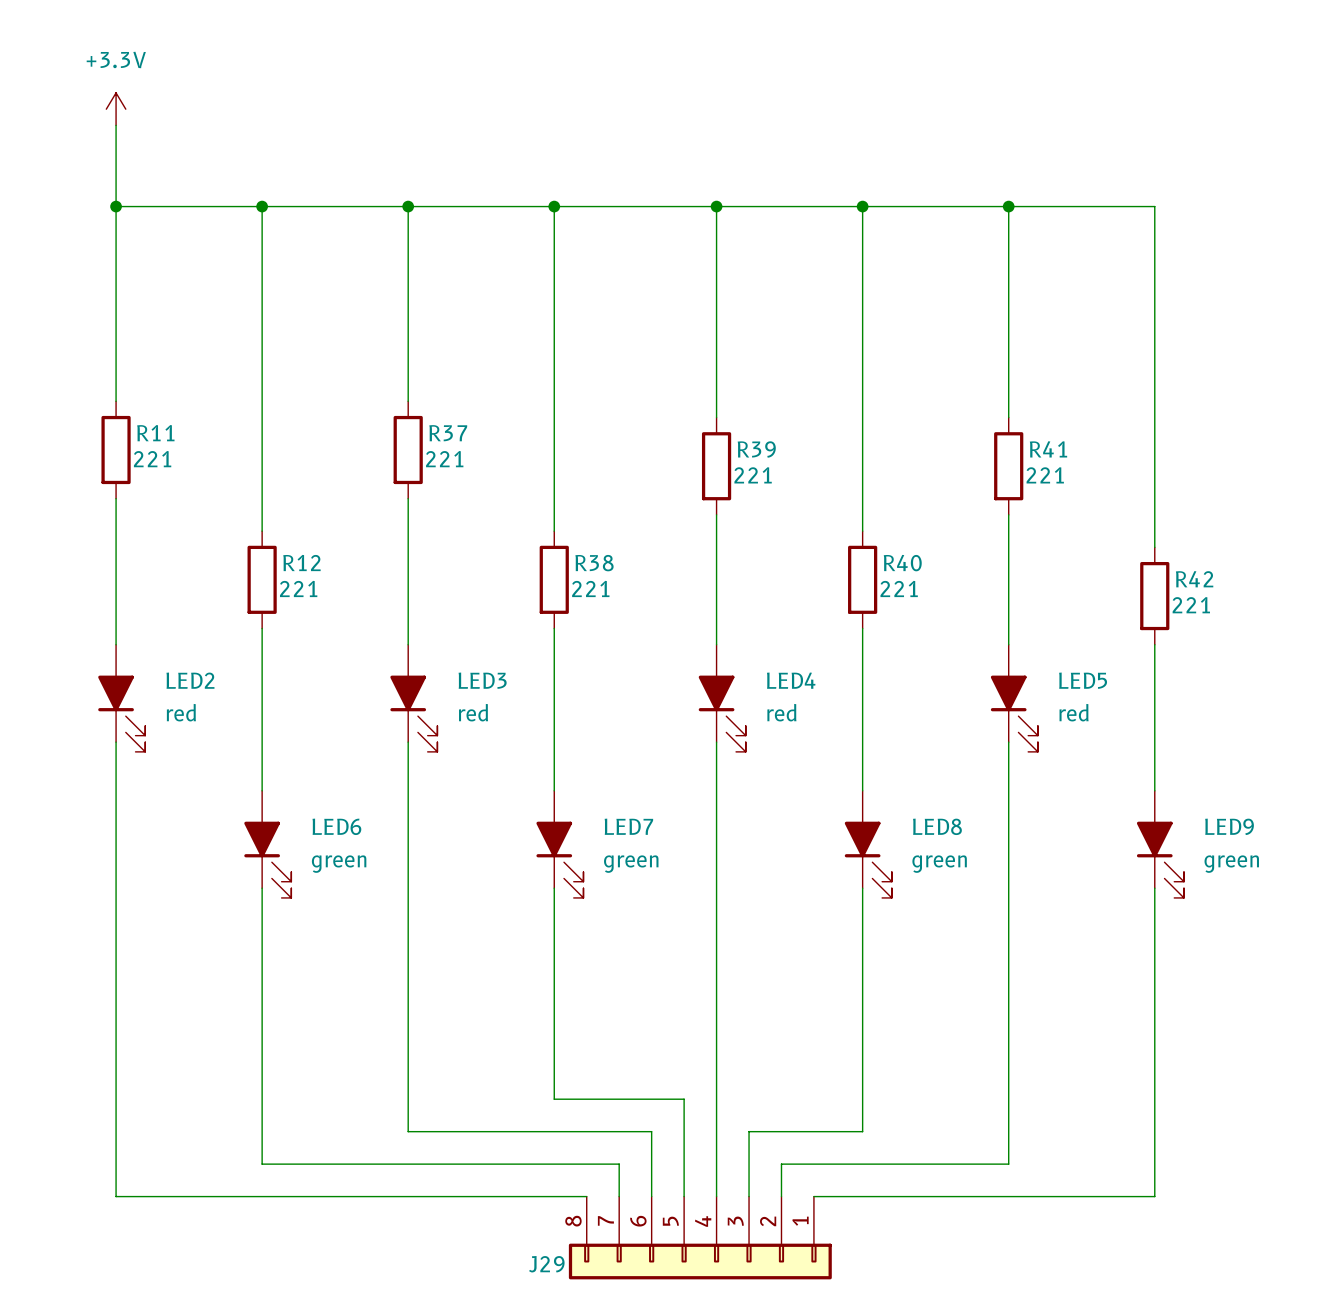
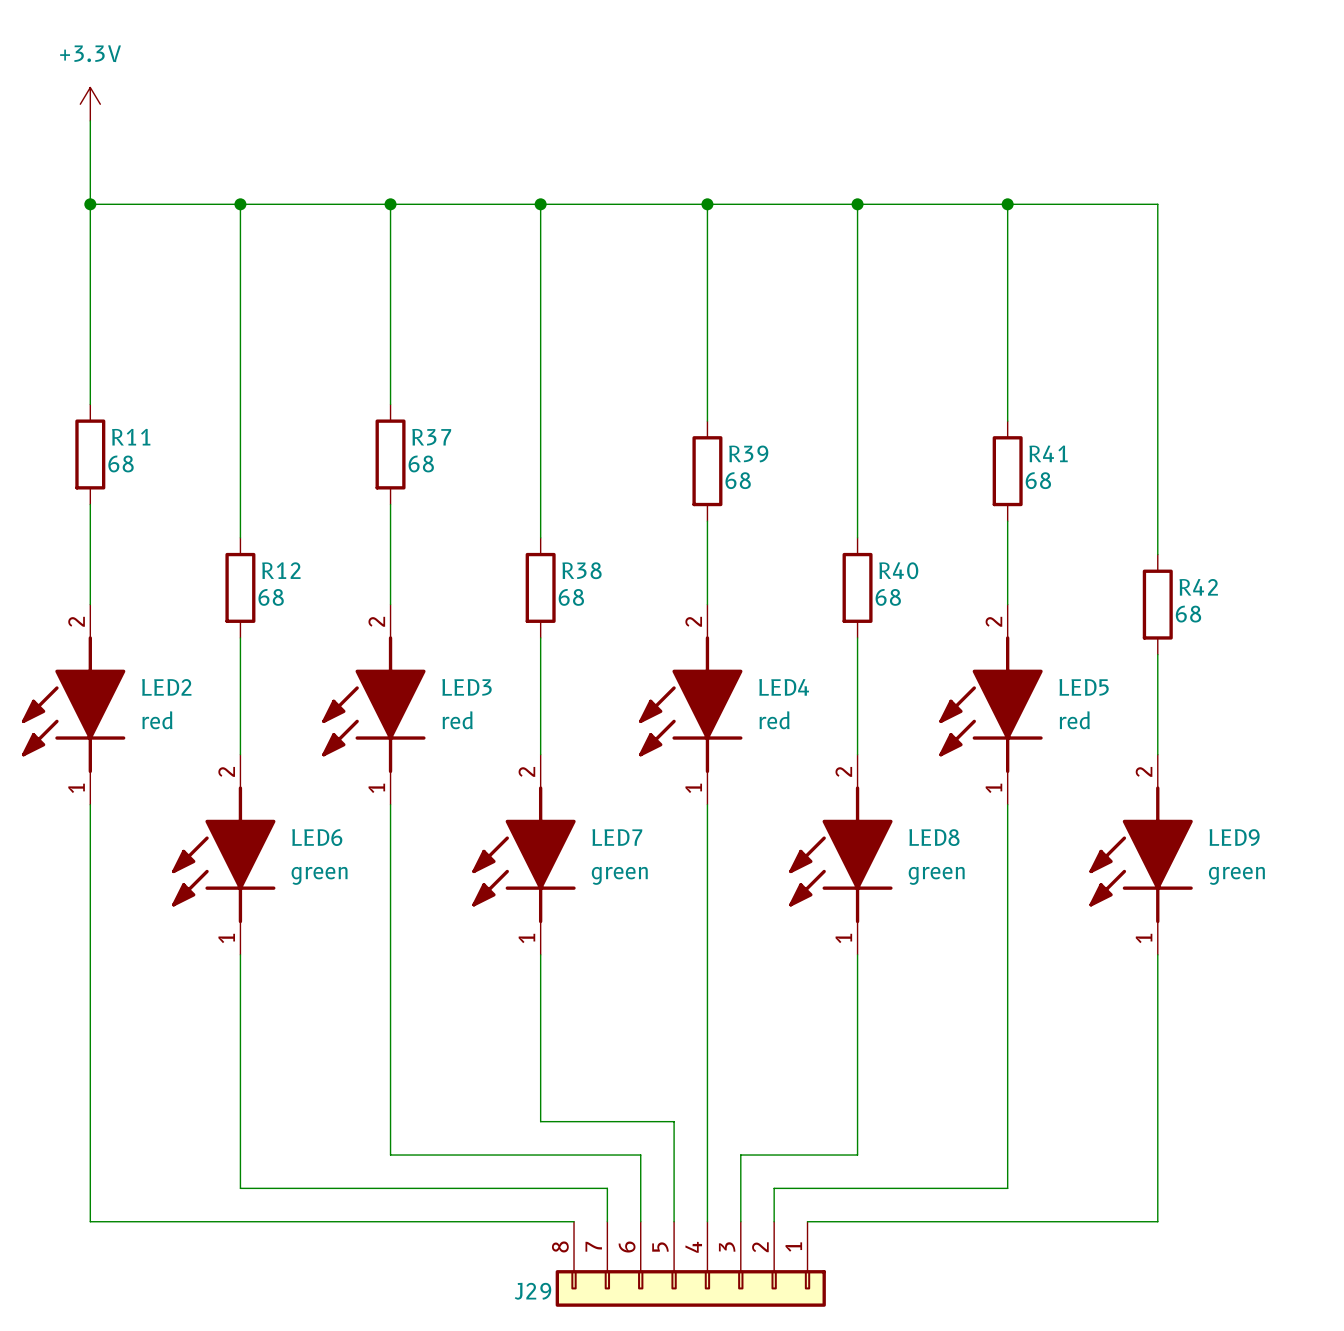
R11 value: 221 (152, 459) -> 68 (121, 463)
R37 value: 221 (444, 459) -> 68 (421, 463)
R39 value: 221 (753, 475) -> 68 (738, 480)
R41 value: 221 (1045, 475) -> 68 (1038, 480)
R12 value: 221 (298, 588) -> 68 (271, 597)
R38 value: 221 (590, 588) -> 68 (571, 597)
R40 value: 221 (899, 588) -> 68 (888, 597)
R42 value: 221 (1191, 605) -> 68 (1188, 614)
LED2 symbol: [98, 644, 146, 752] -> [21, 604, 126, 805]
LED3 symbol: [390, 644, 438, 752] -> [322, 604, 426, 805]
LED4 symbol: [698, 644, 746, 752] -> [639, 604, 743, 805]
LED5 symbol: [990, 644, 1038, 752] -> [939, 604, 1043, 805]
LED6 symbol: [244, 790, 292, 898] -> [172, 754, 276, 955]
LED7 symbol: [536, 790, 584, 898] -> [472, 754, 576, 955]
LED8 symbol: [844, 790, 892, 898] -> [789, 754, 893, 955]
LED9 symbol: [1136, 790, 1184, 898] -> [1089, 754, 1193, 955]

